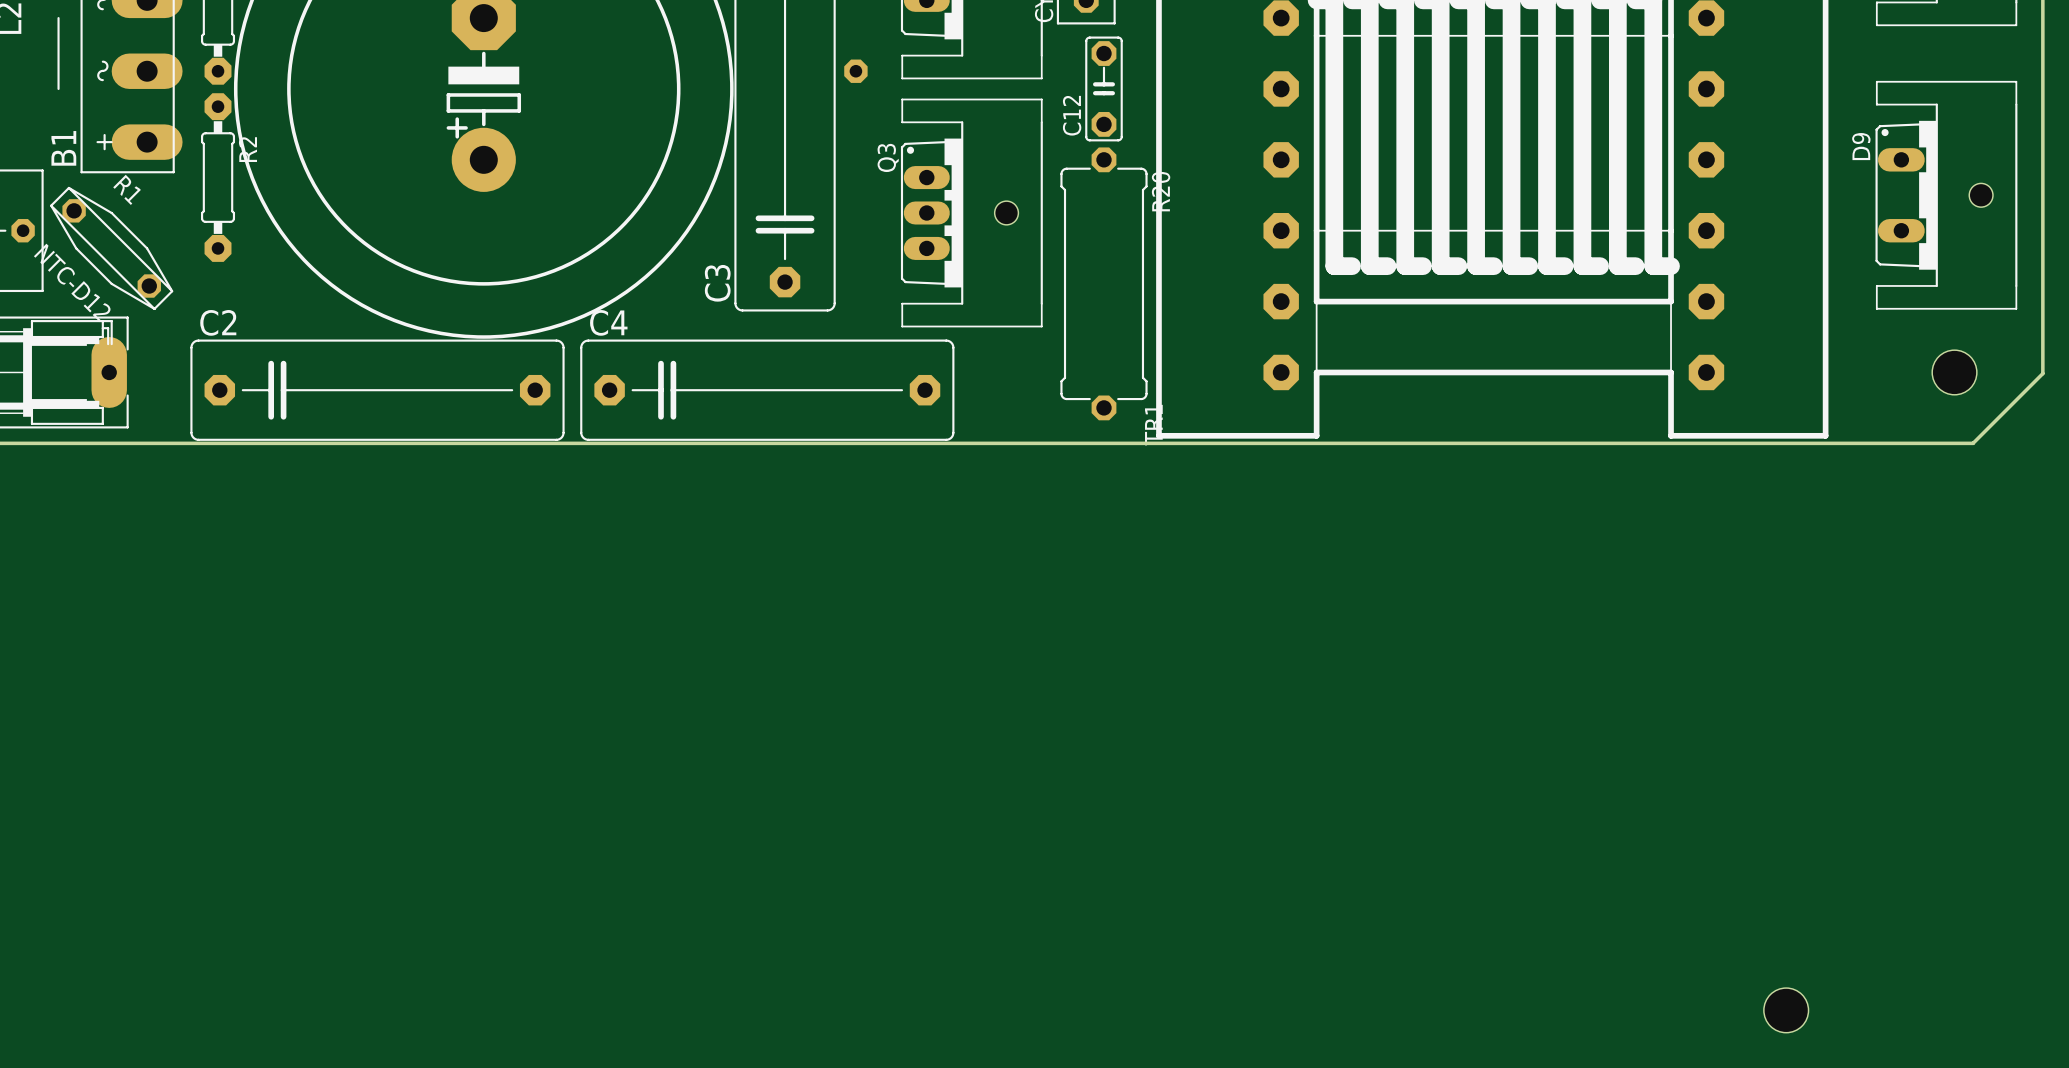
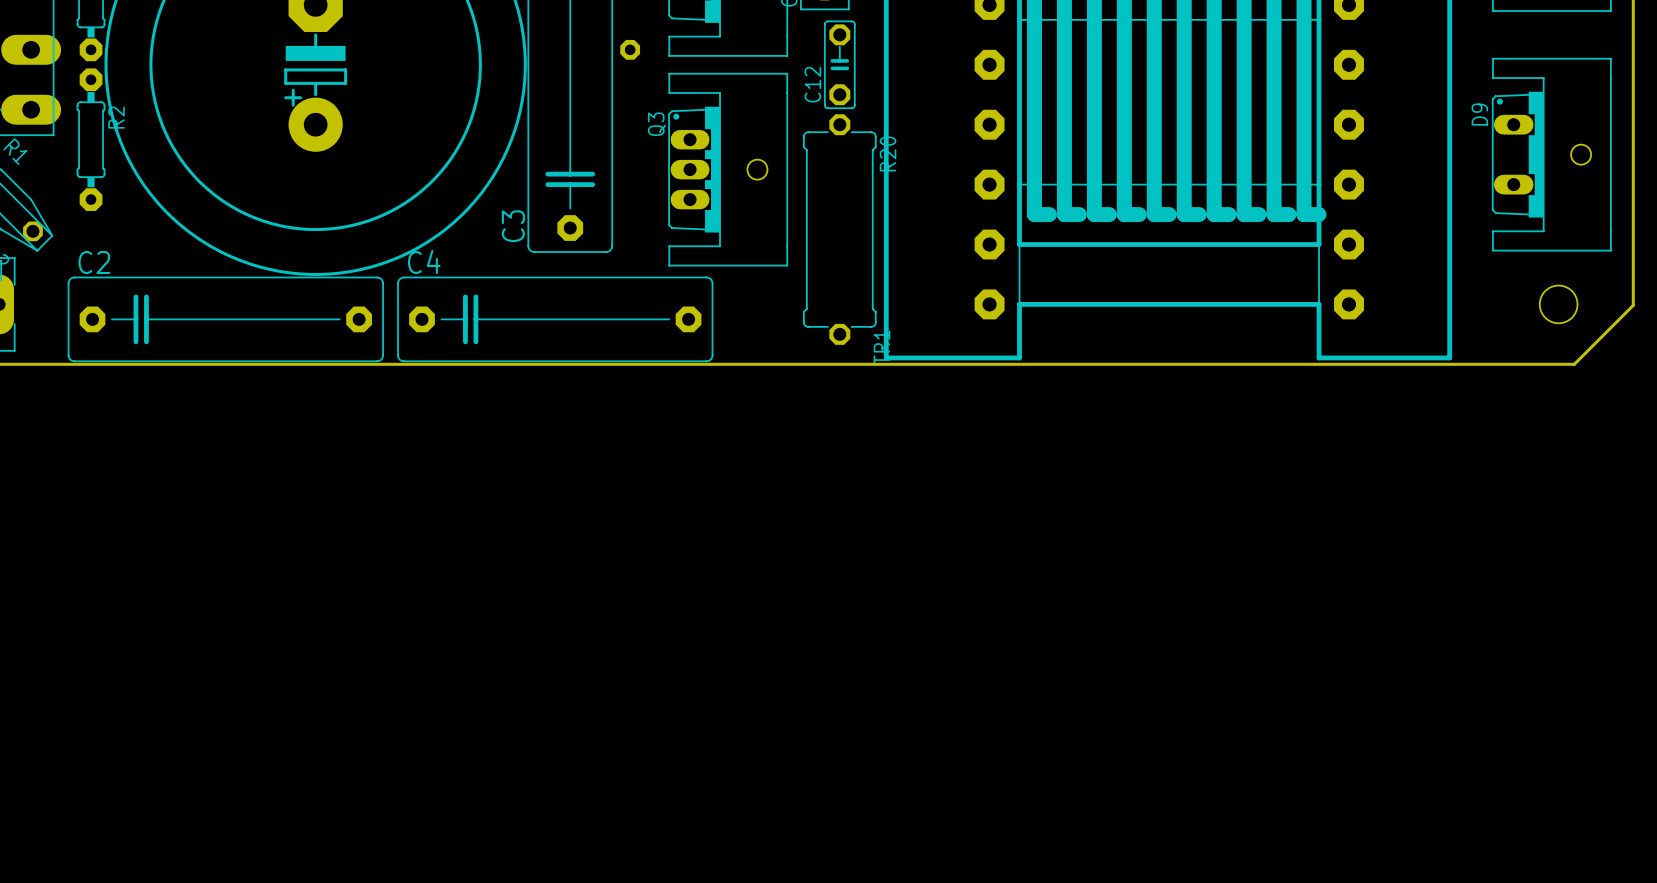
hole: (1786, 1010) -> none

